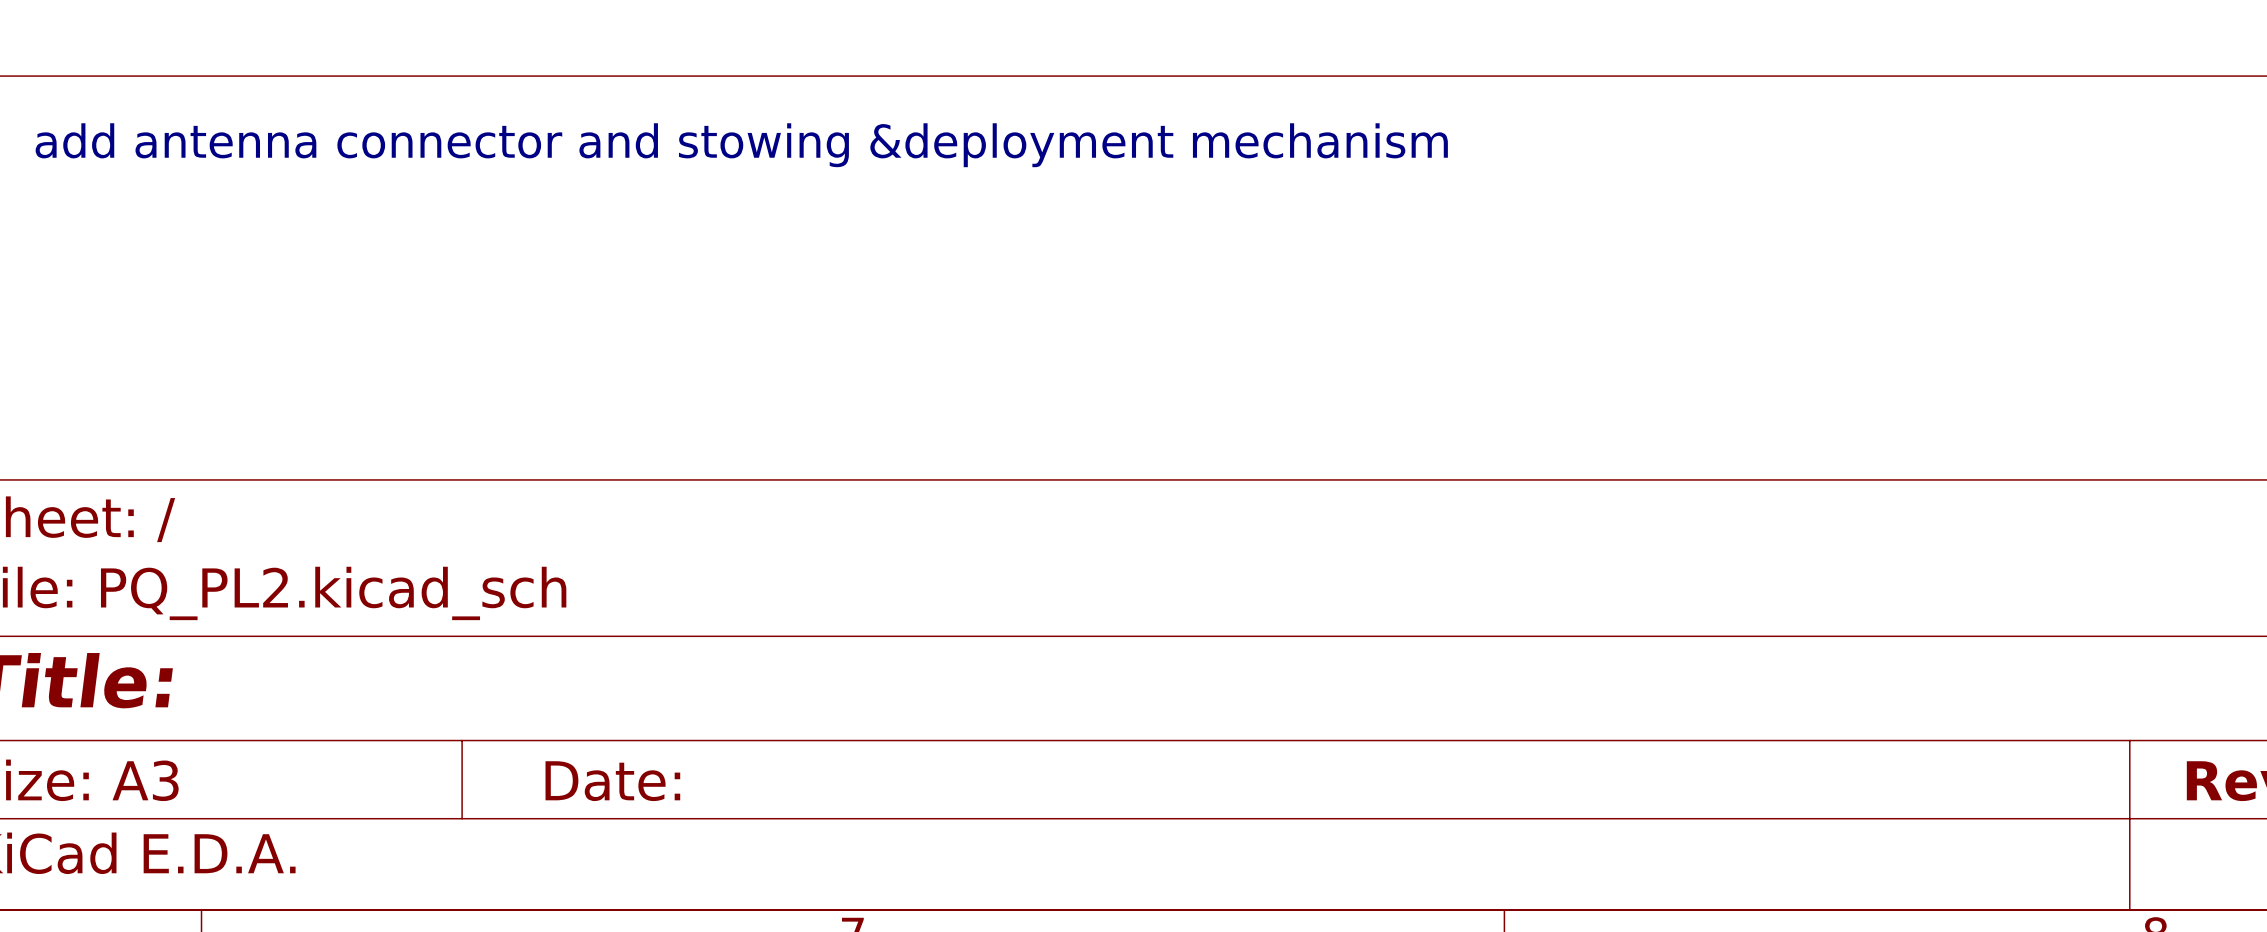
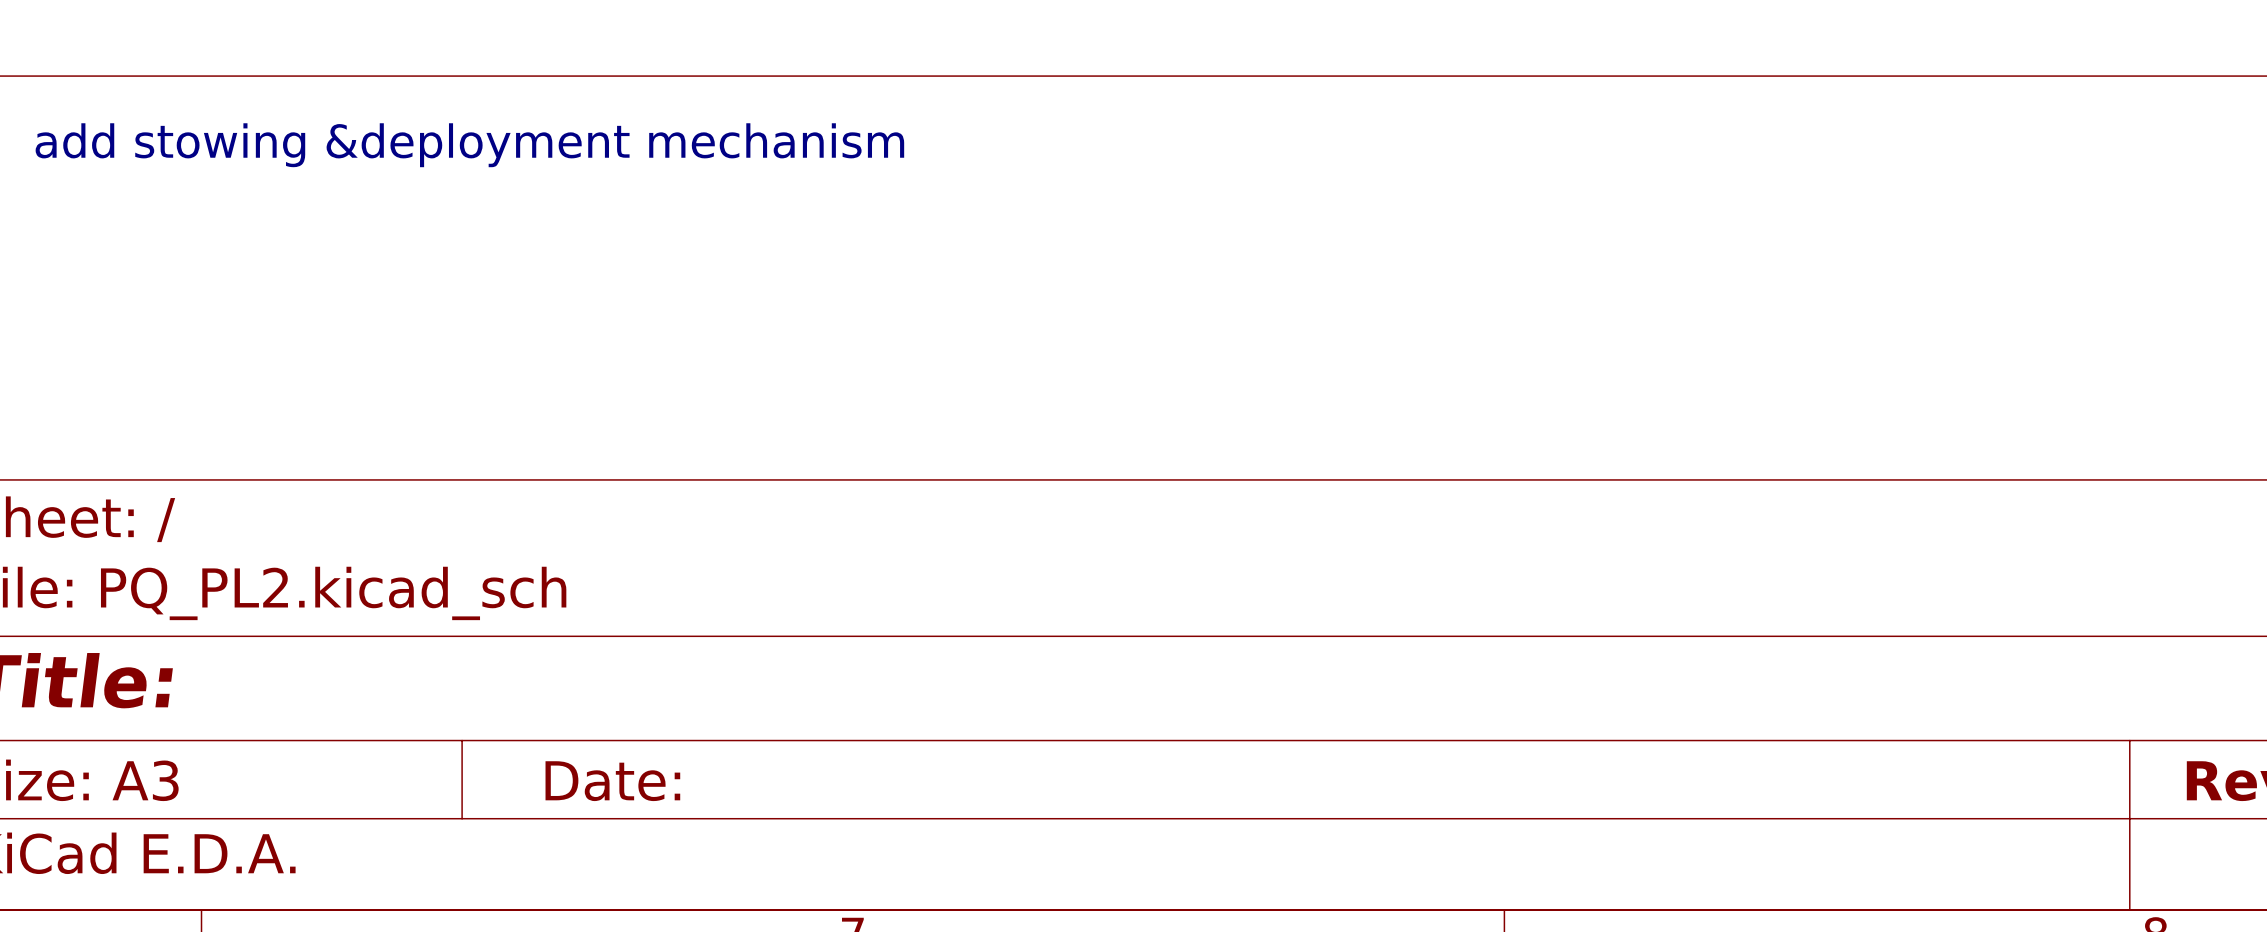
text: add antenna connector and stowing &deployment mechanism (741, 145) -> add stowing &deployment mechanism (469, 145)

